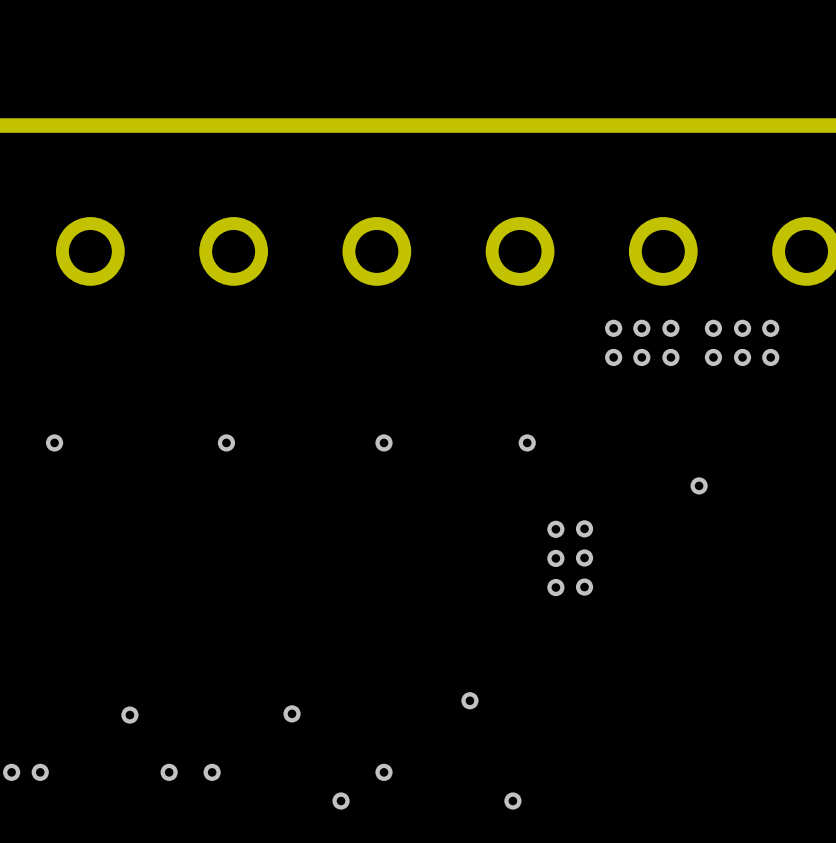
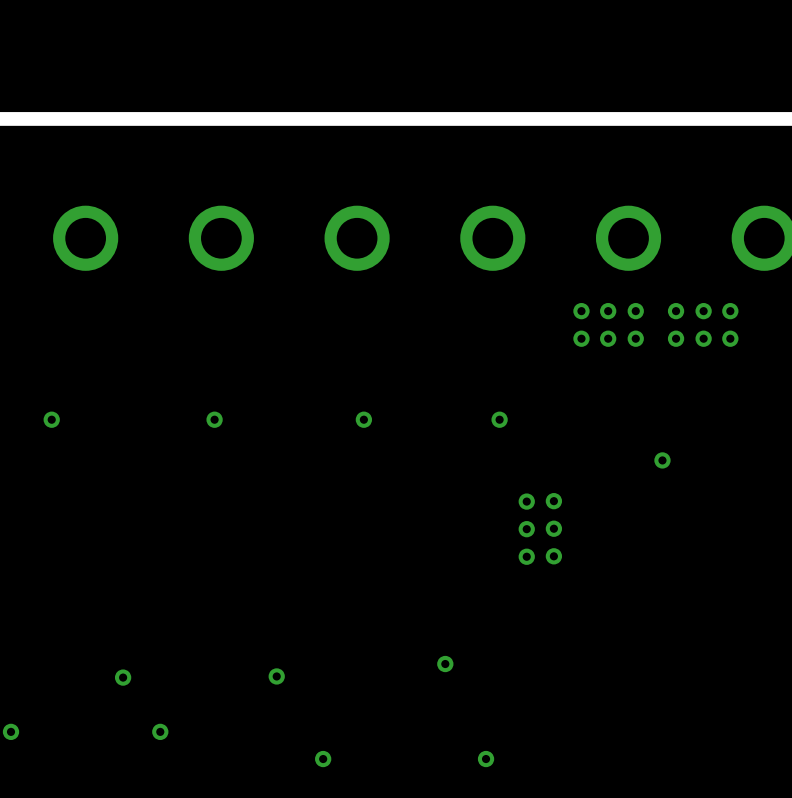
via: (40, 772) -> none
via: (212, 772) -> none
via: (384, 772) -> none

